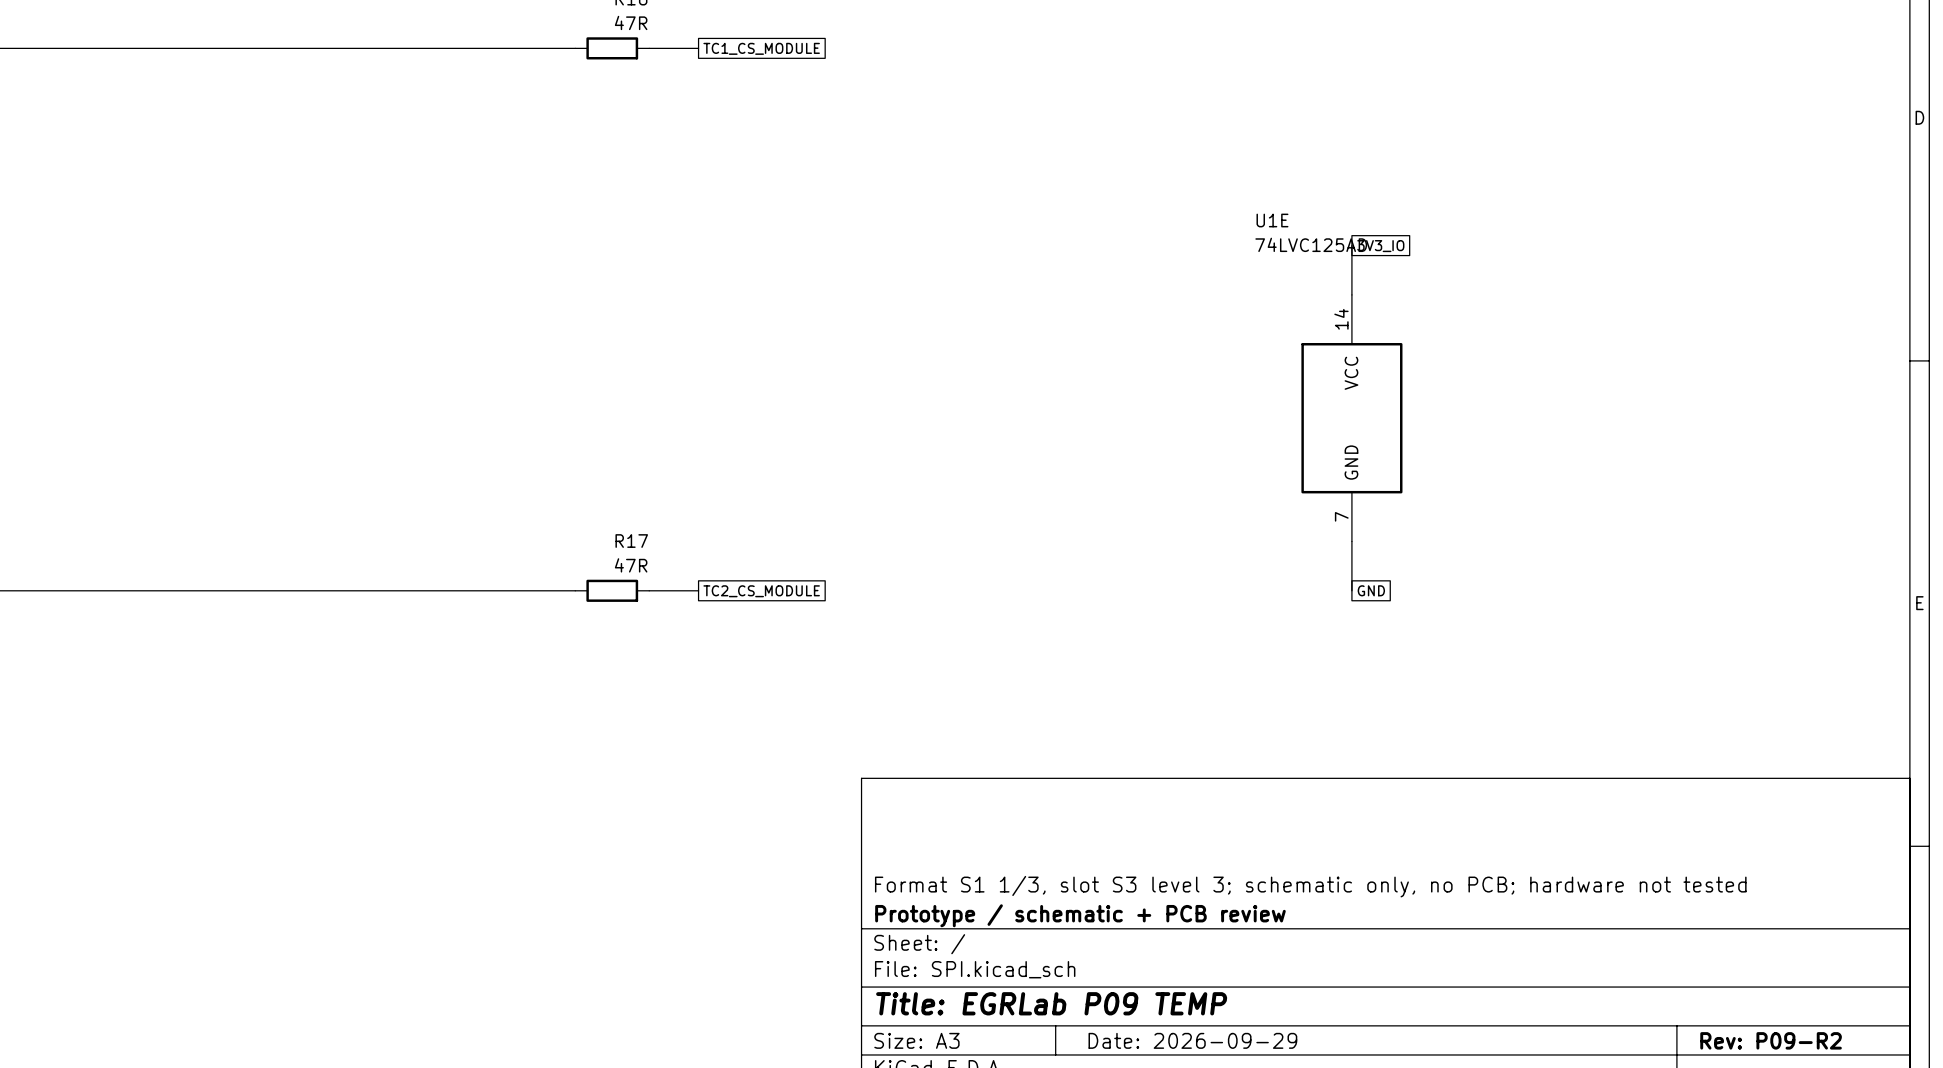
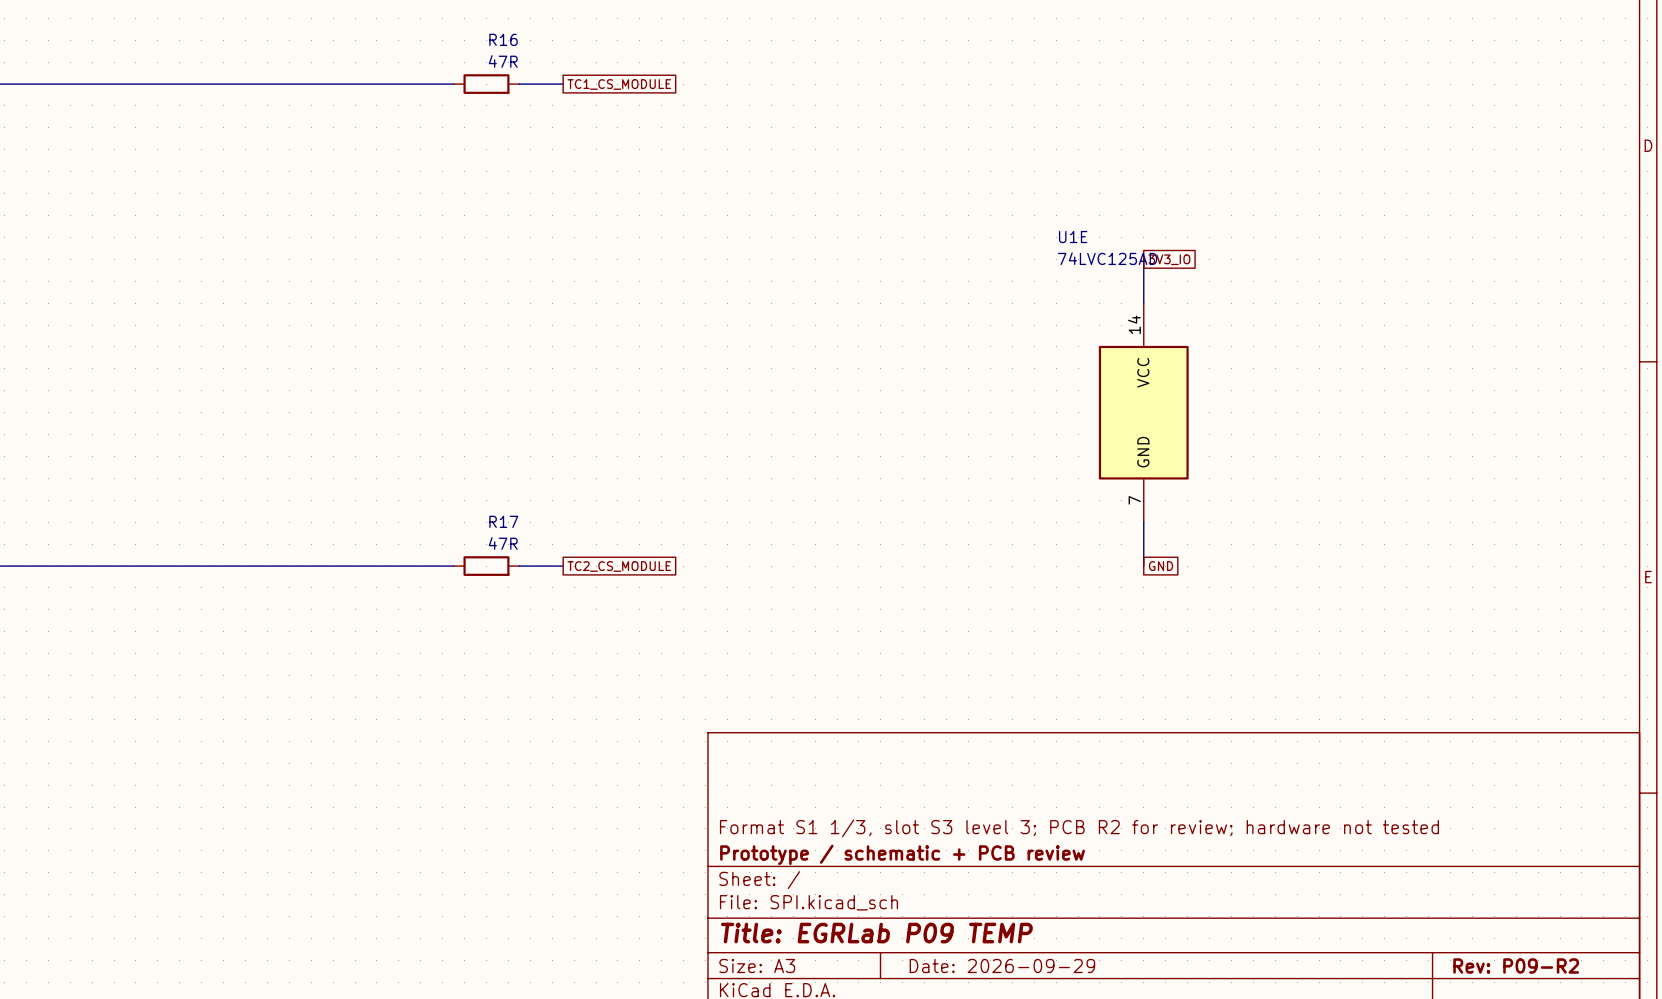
title block: Format S1 1/3, slot S3 level 3; schematic only, no PCB; hardware not tested (1310, 886) -> Format S1 1/3, slot S3 level 3; PCB R2 for review; hardware not tested (1079, 828)

